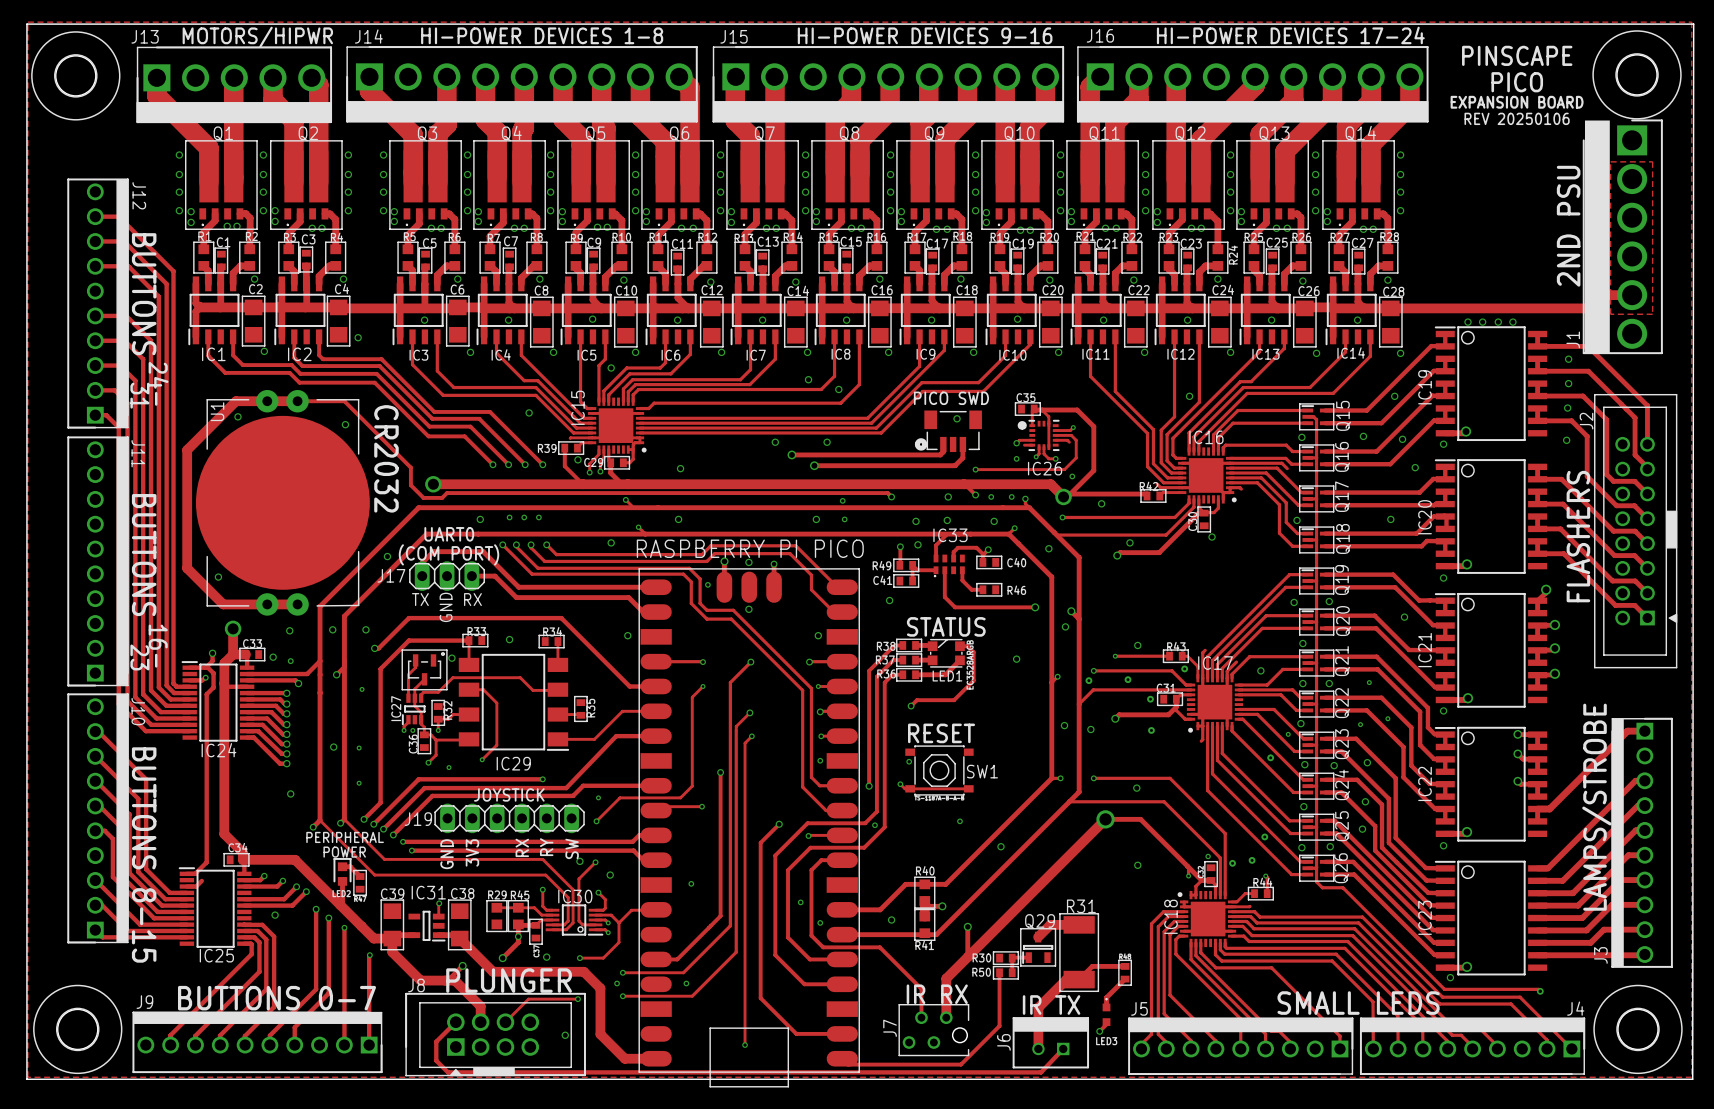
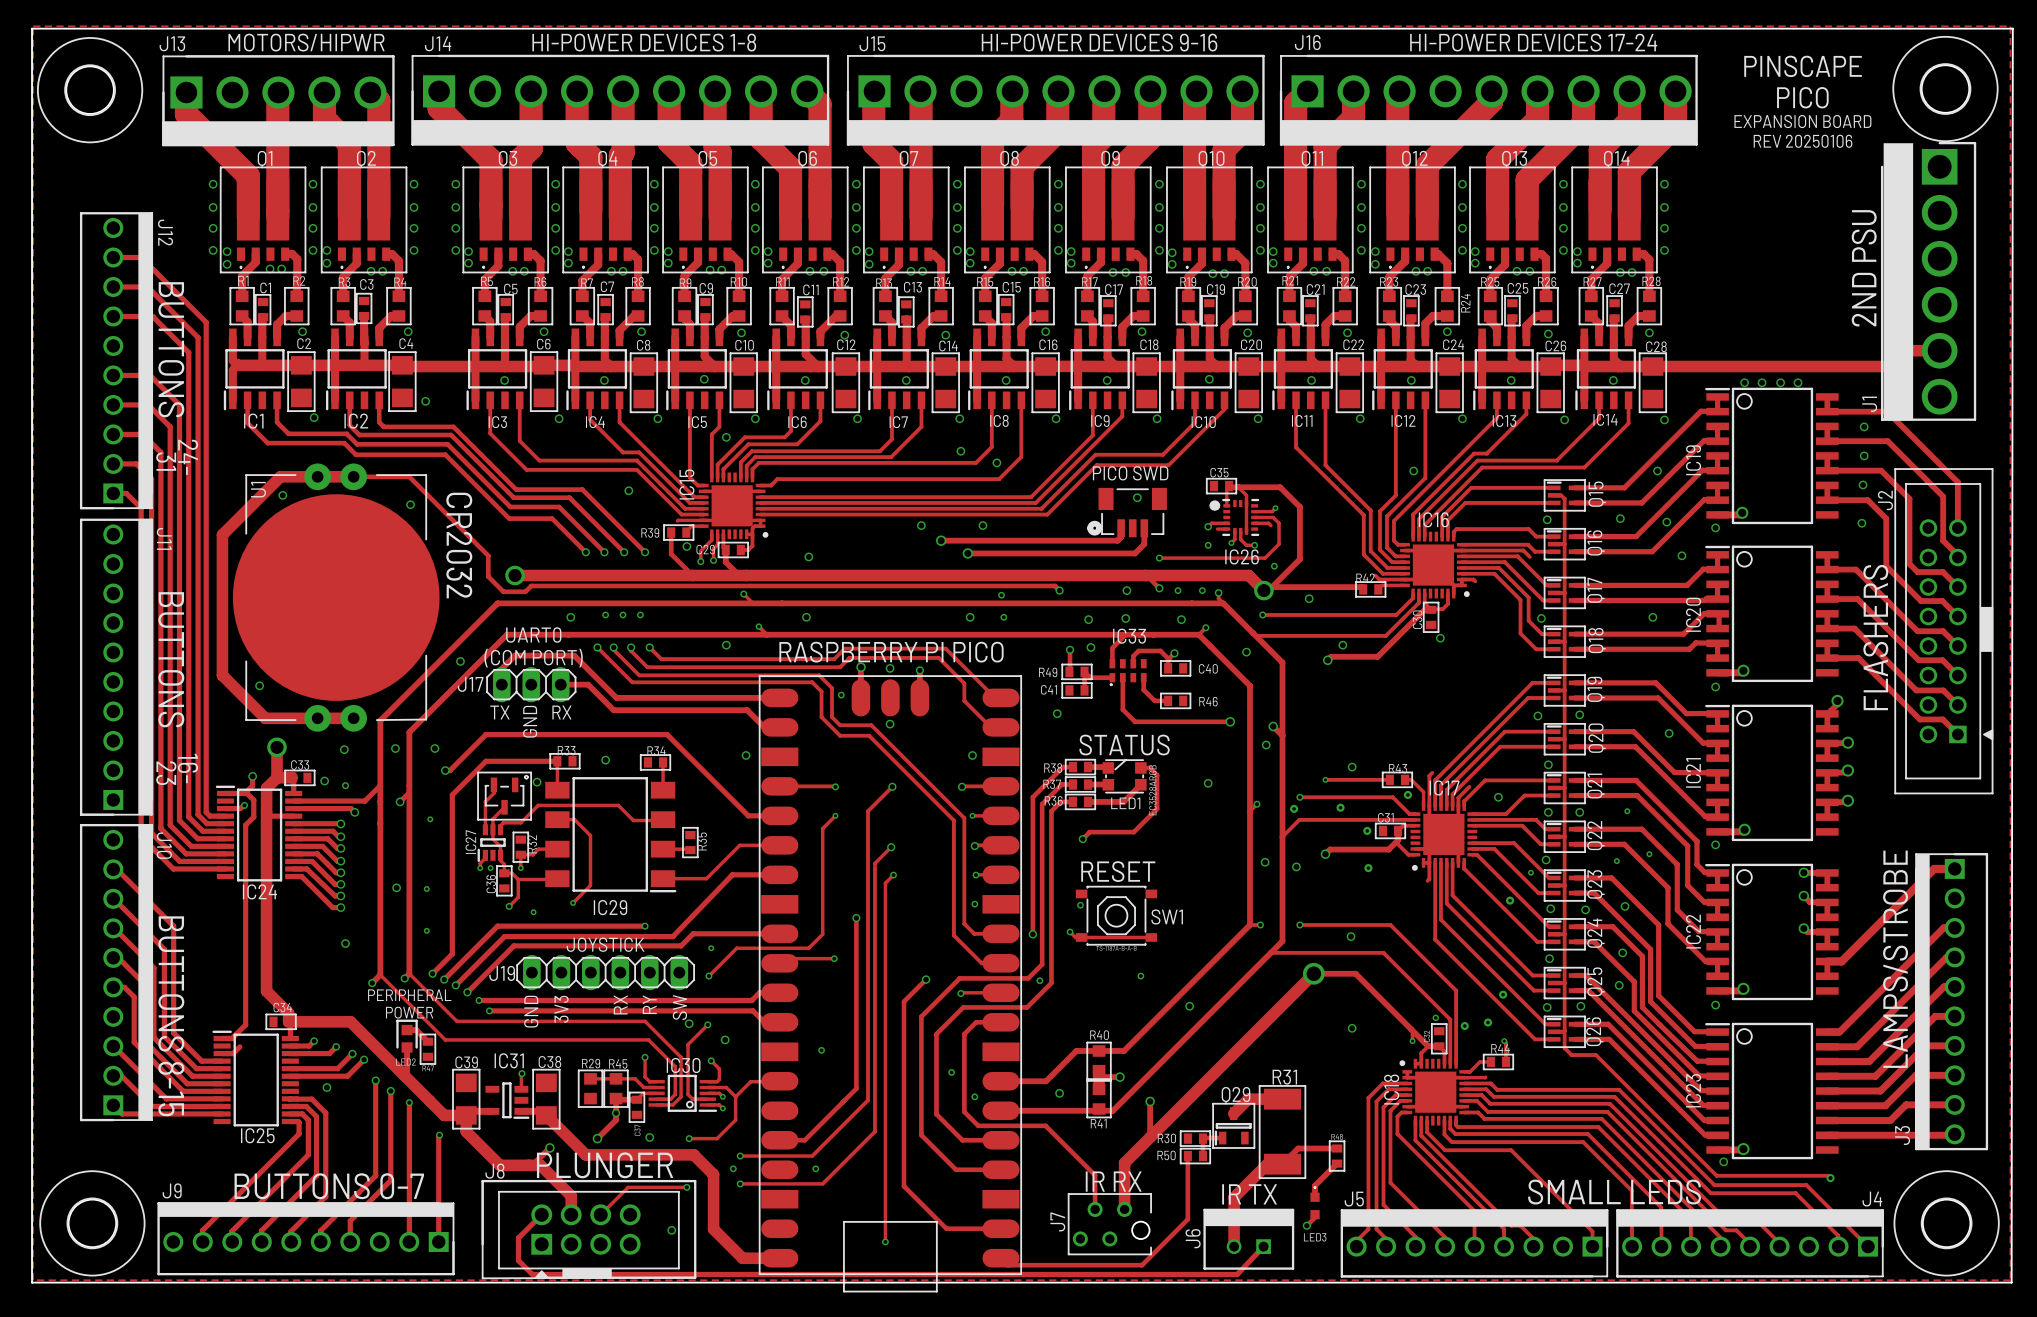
zone outline: (1610, 161) (1652, 161) (1652, 314) (1610, 314) (1610, 161) -> none

